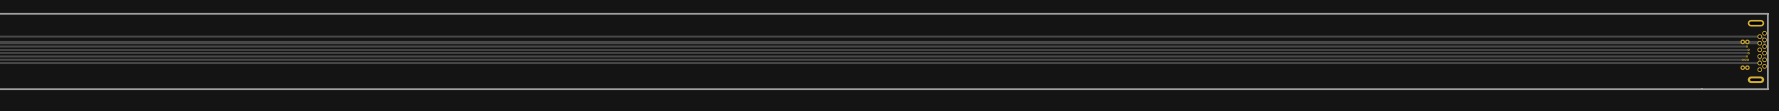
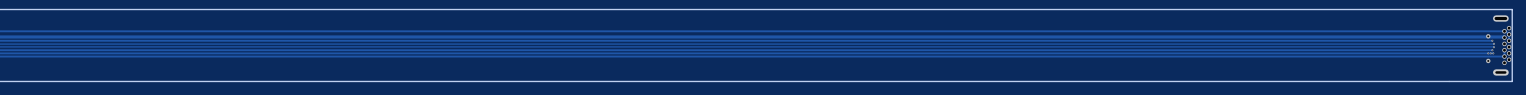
via: (1747, 41) -> none
via: (1747, 67) -> none

